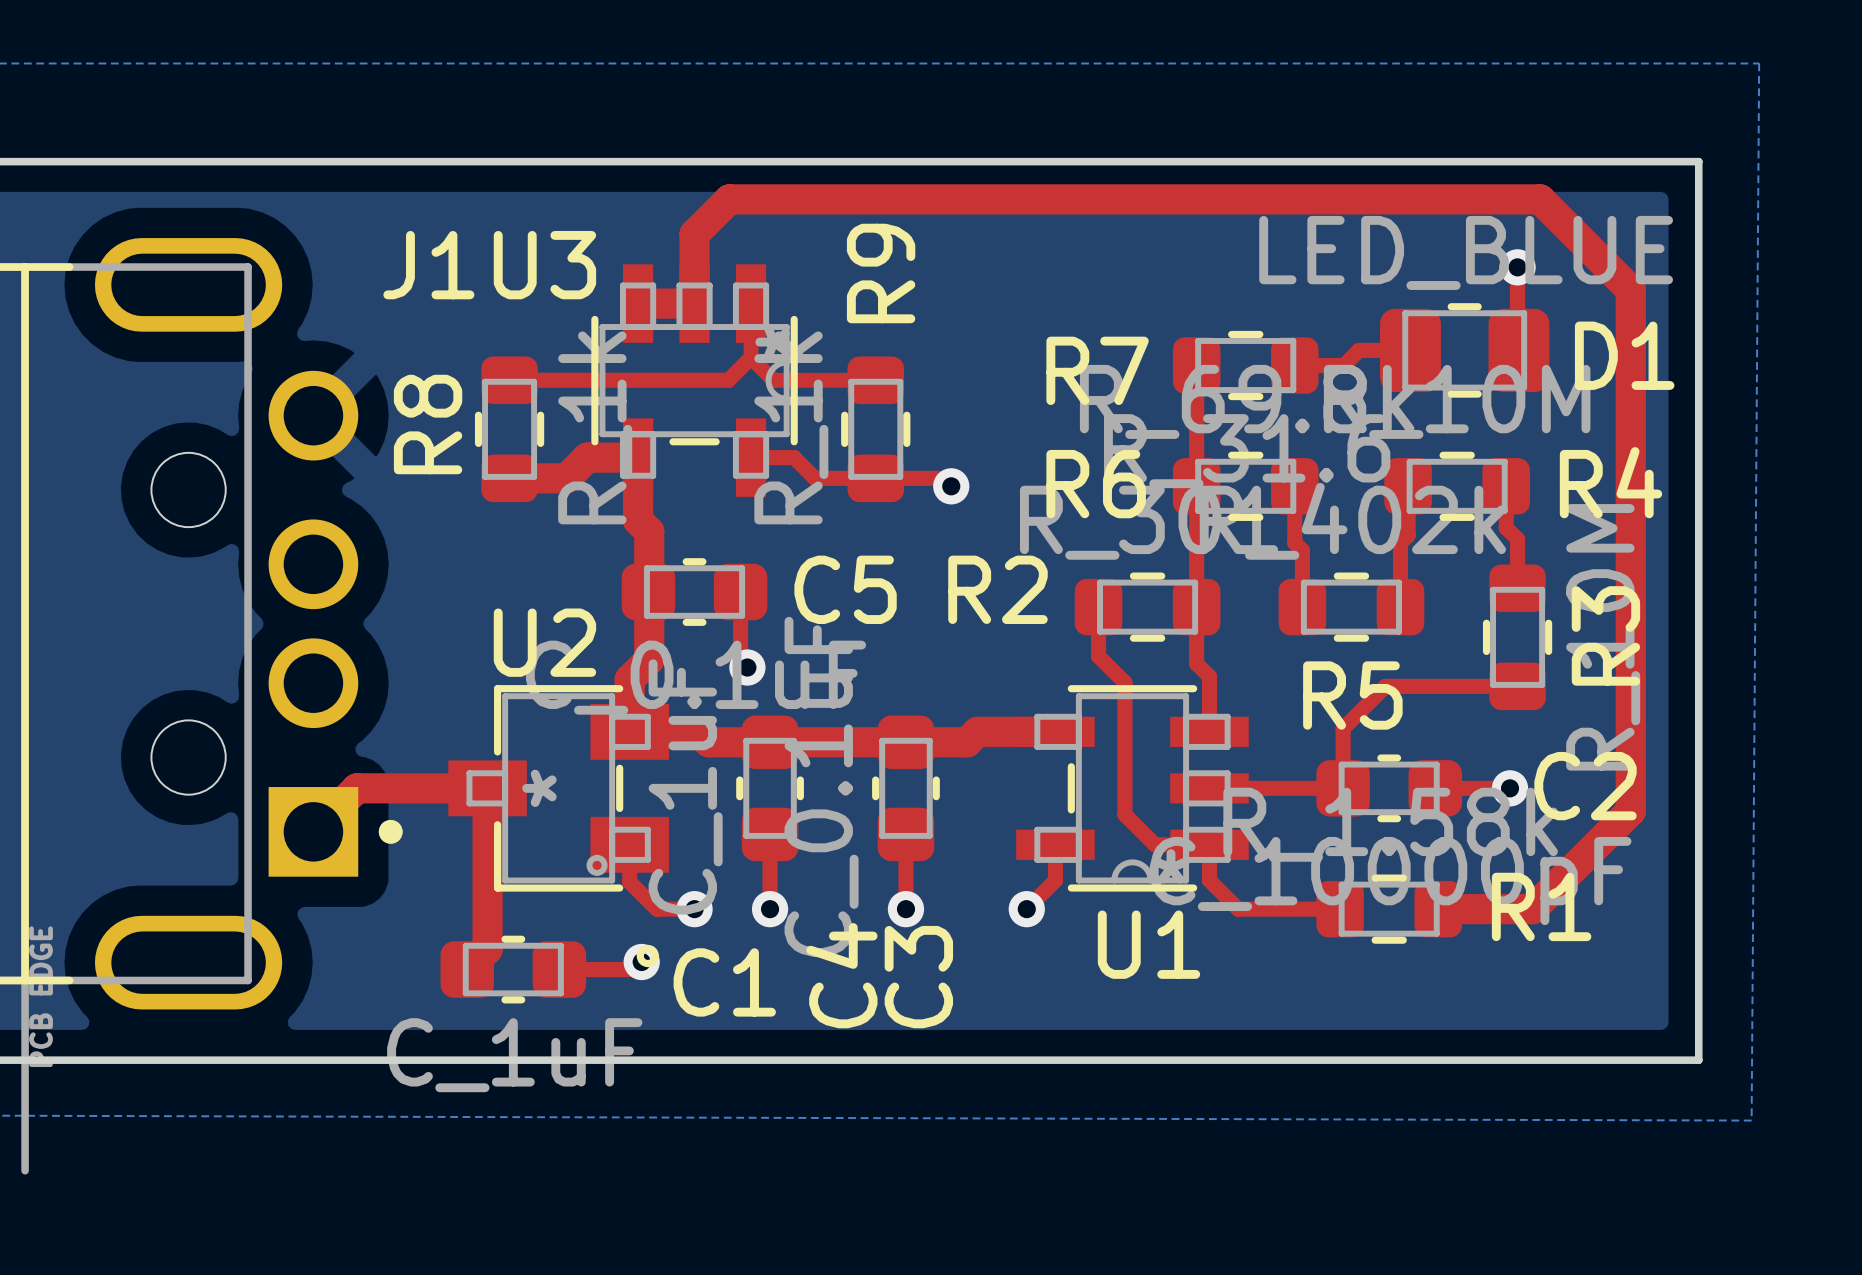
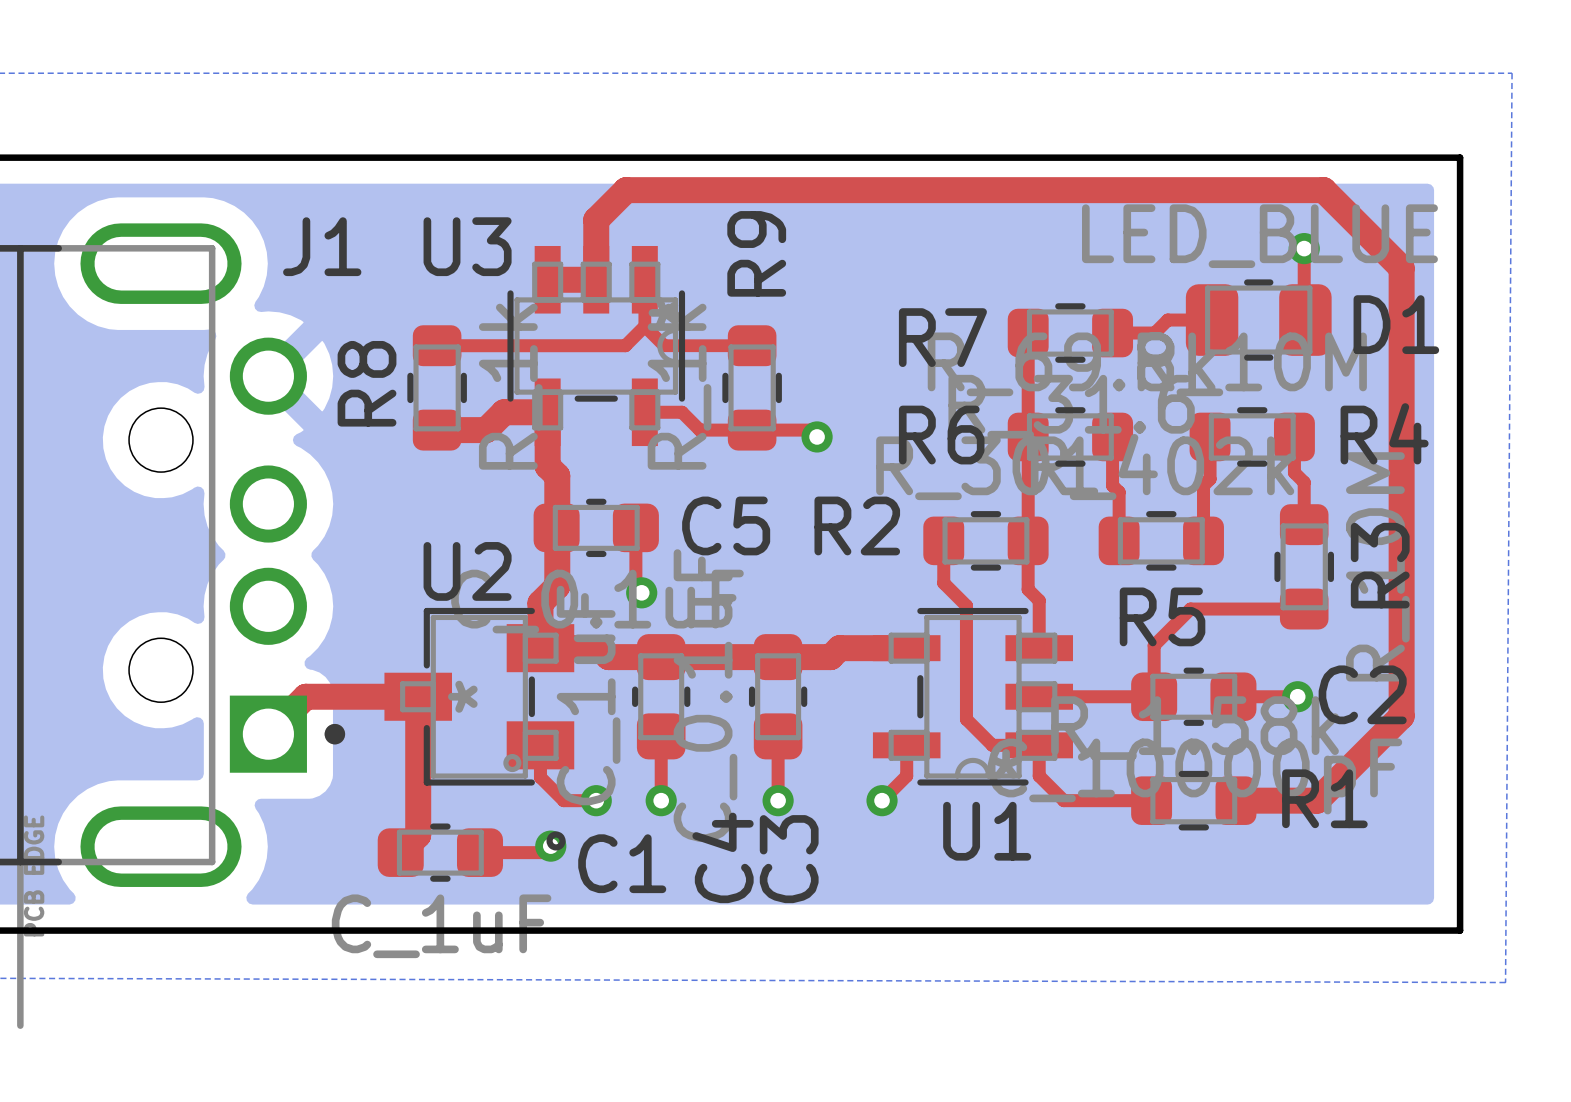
J1 name position: J1 (428, 265) -> J1 (322, 246)

